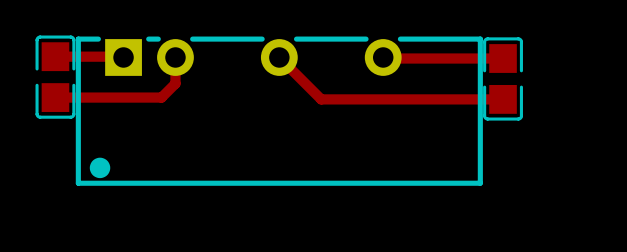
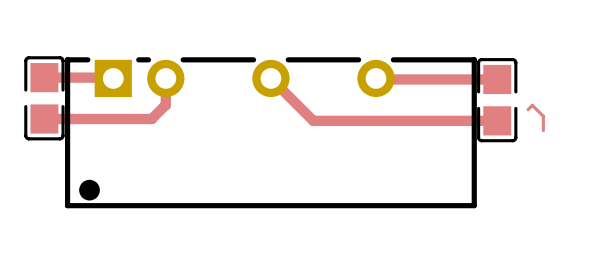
top track: none -> (528, 109) (532, 105) (543, 116) (543, 130)

